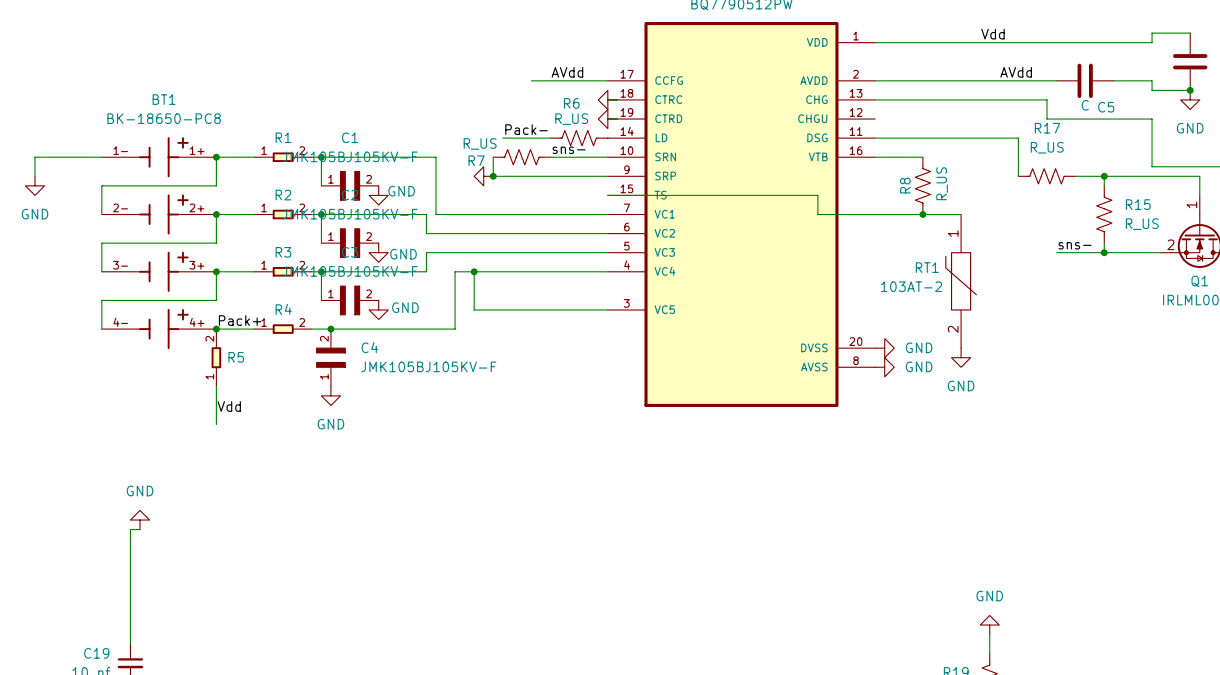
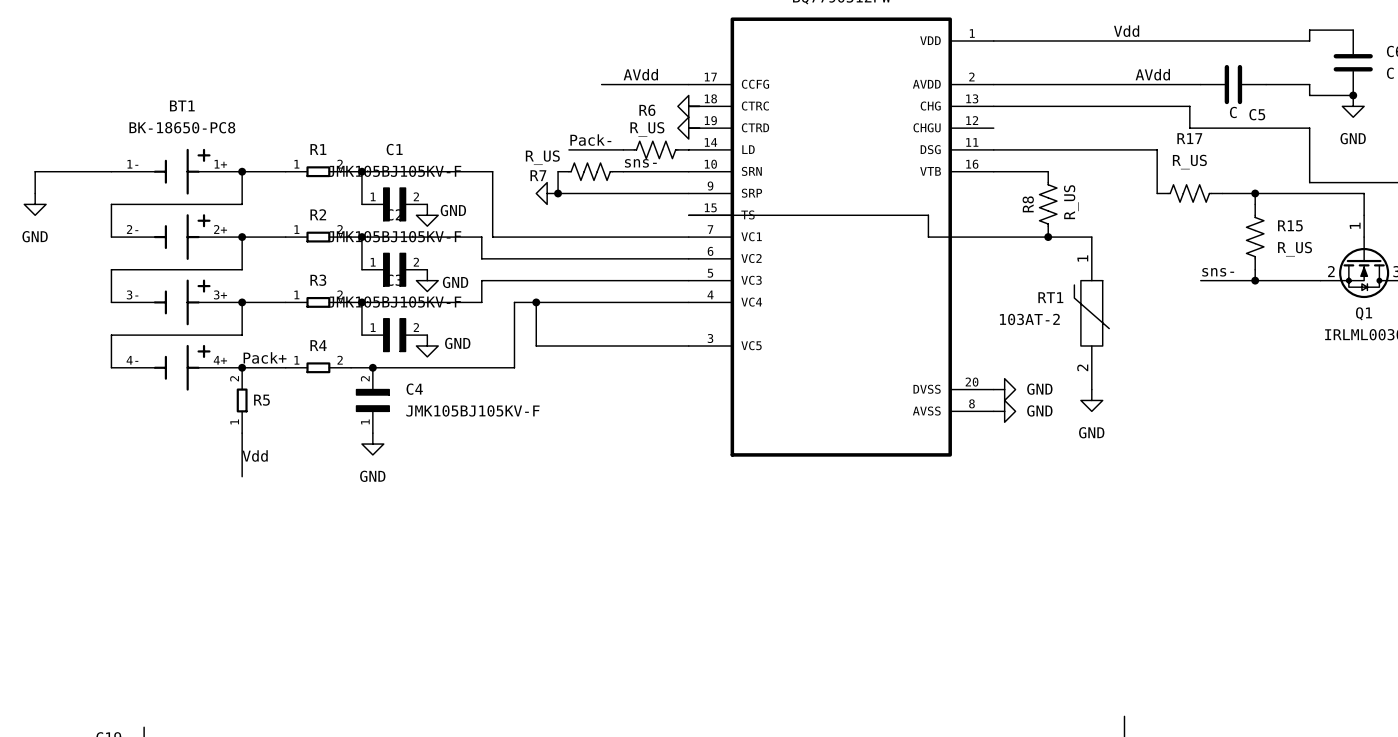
power symbol: GND (140, 520) -> none
wire: (140, 529) (130, 529) (130, 644) -> none
power symbol: GND (989, 625) -> none

